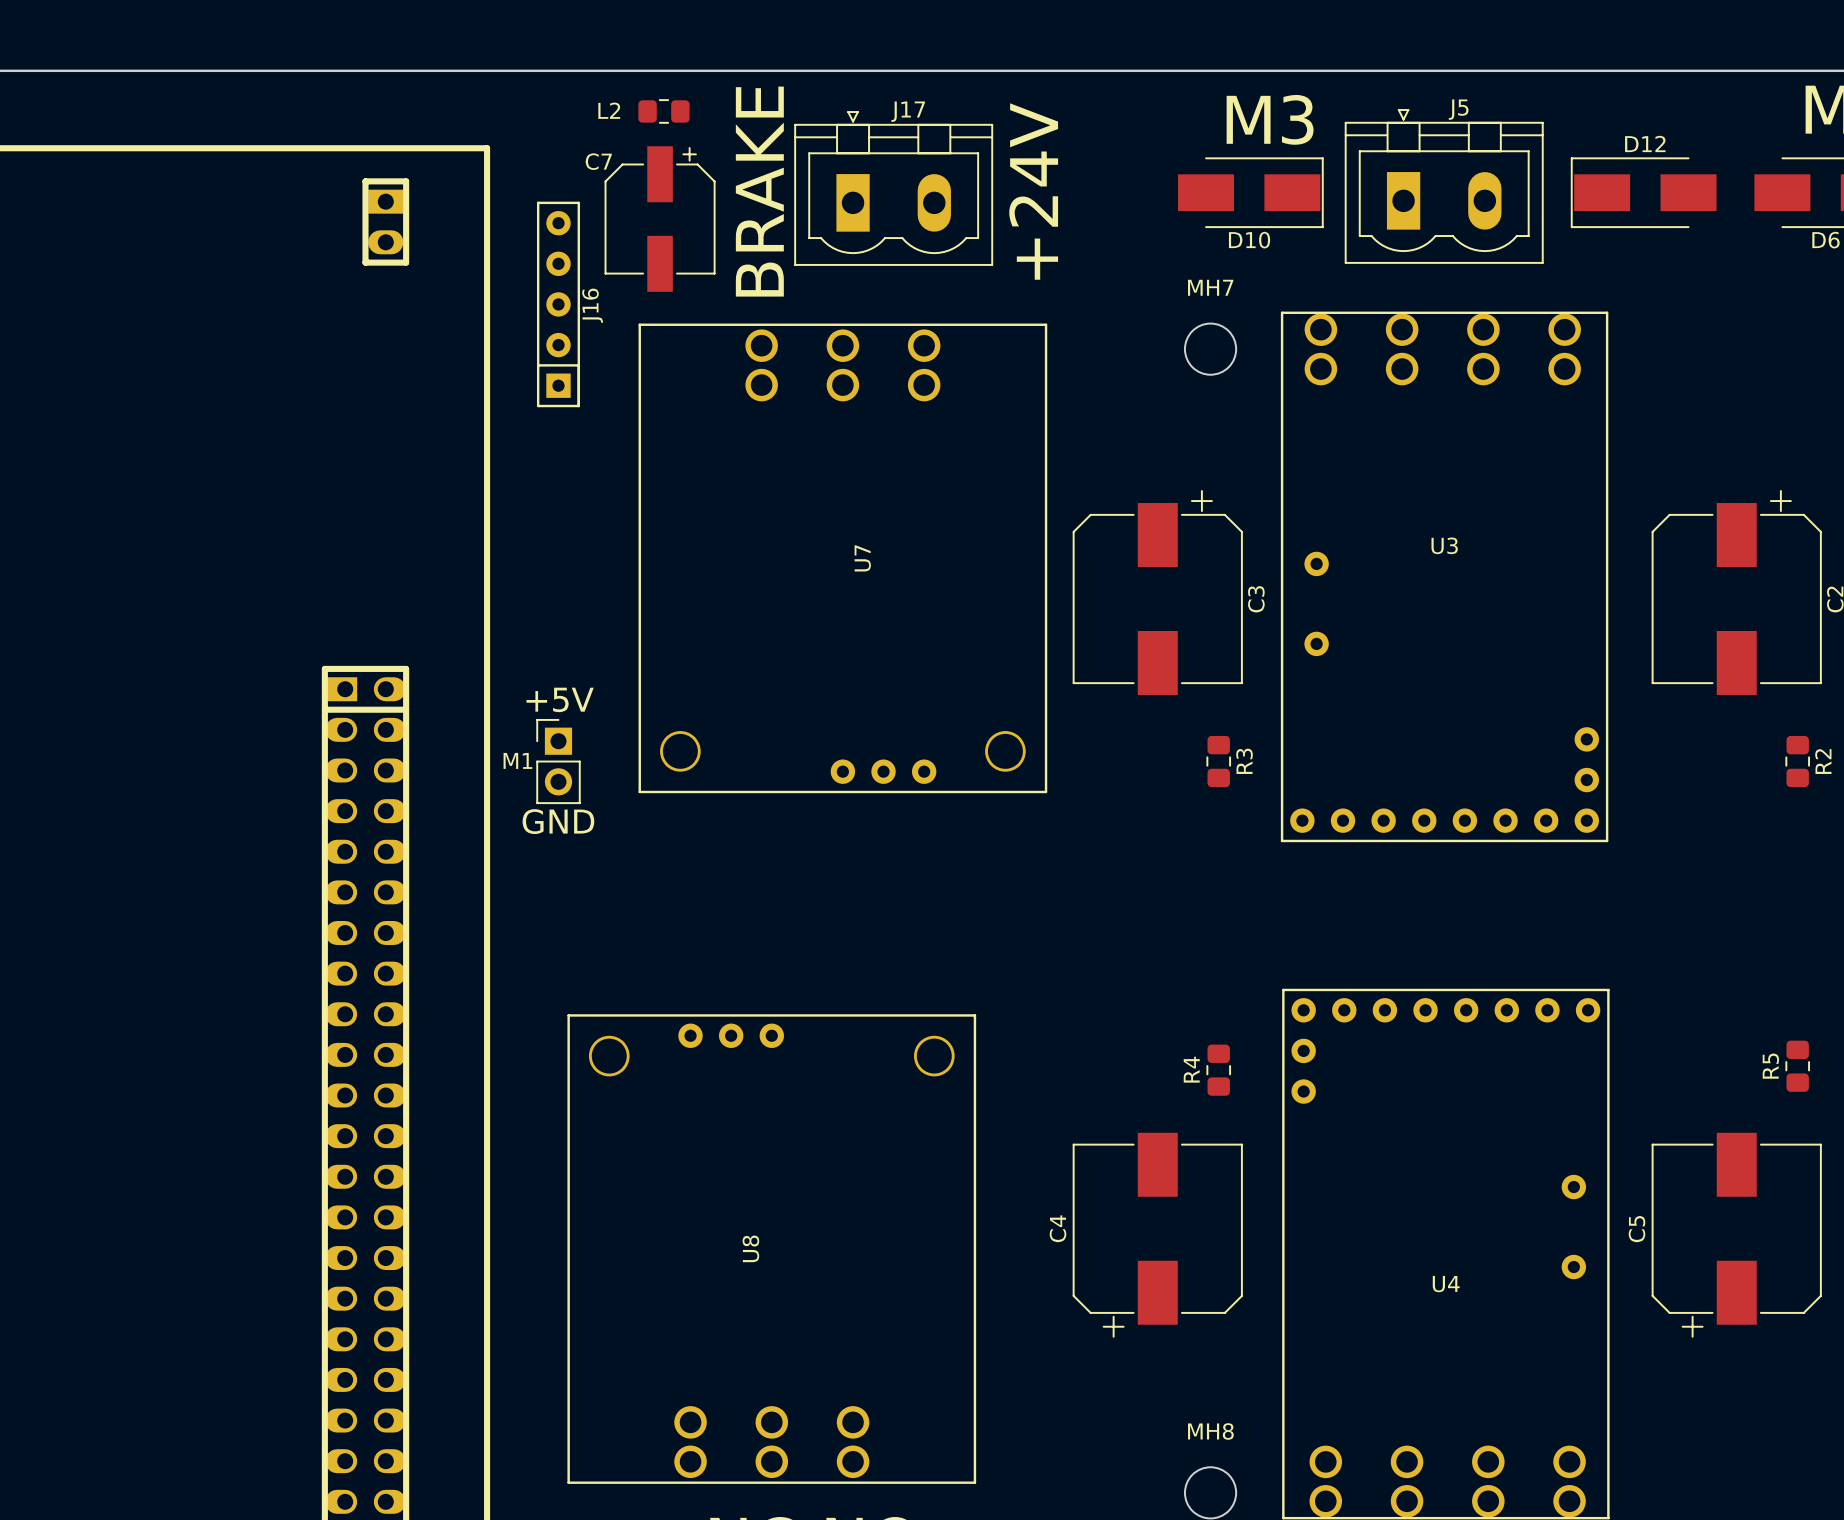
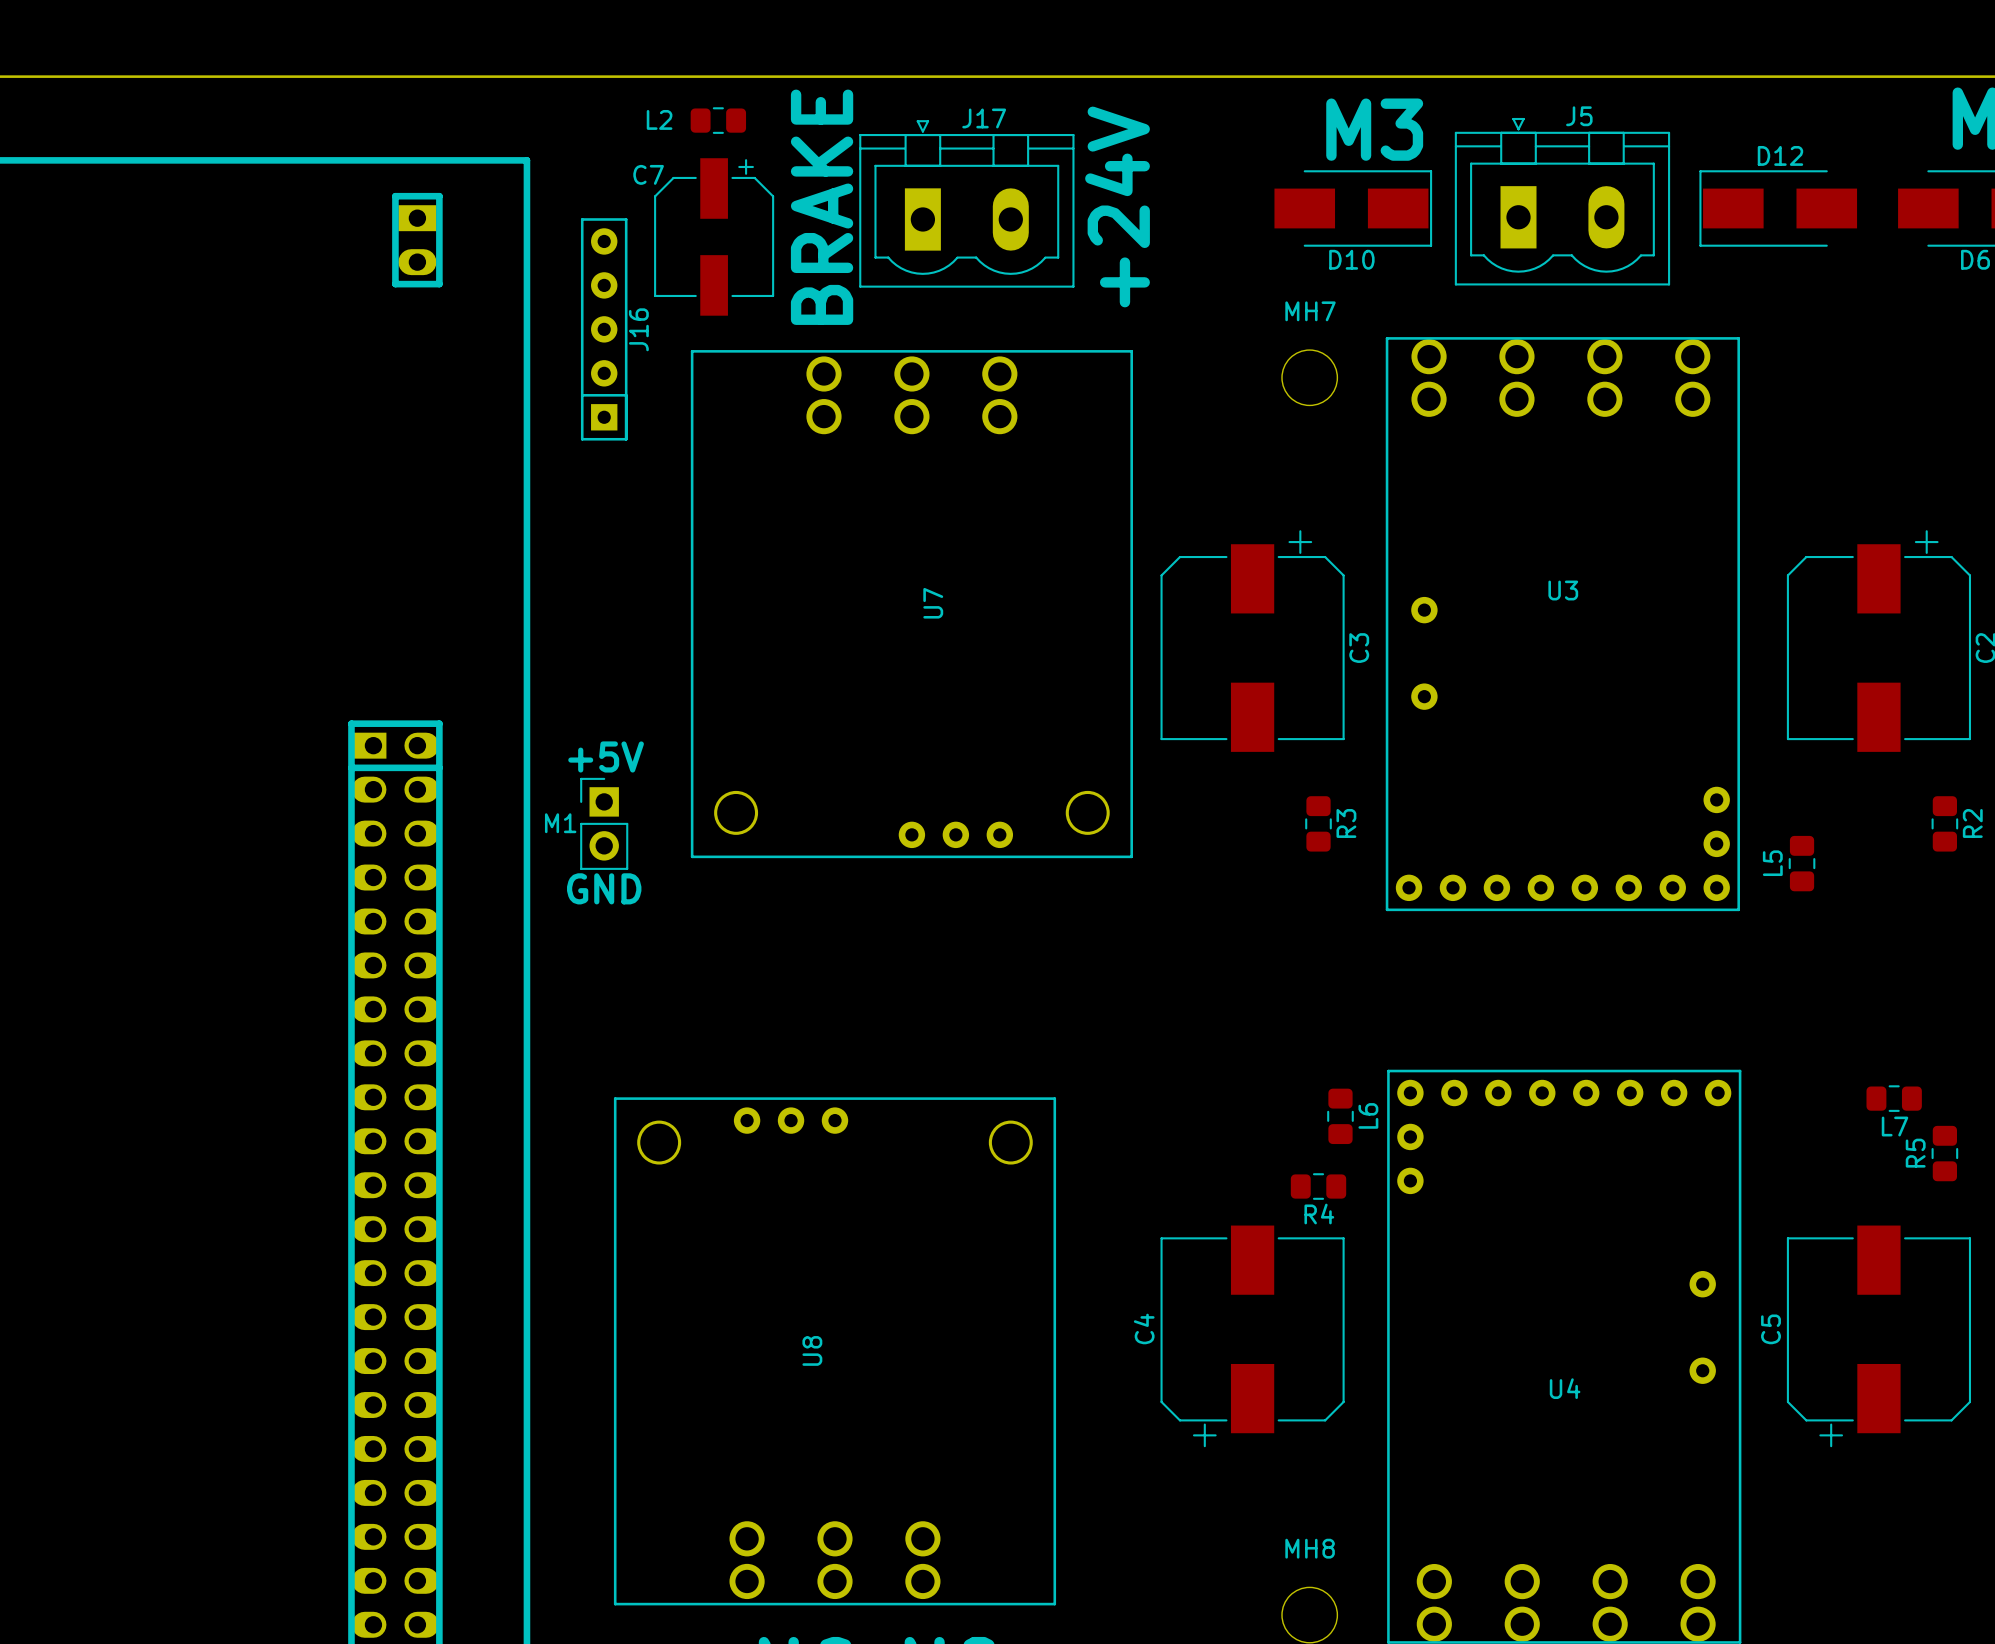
L5: none -> (1802, 863)
L7: none -> (1894, 1098)
L6: none -> (1340, 1116)
R4 name position: R4 (1191, 1069) -> R4 (1319, 1214)
R4 rotation: 0° (1218, 1070) -> 90° clockwise (1318, 1186)

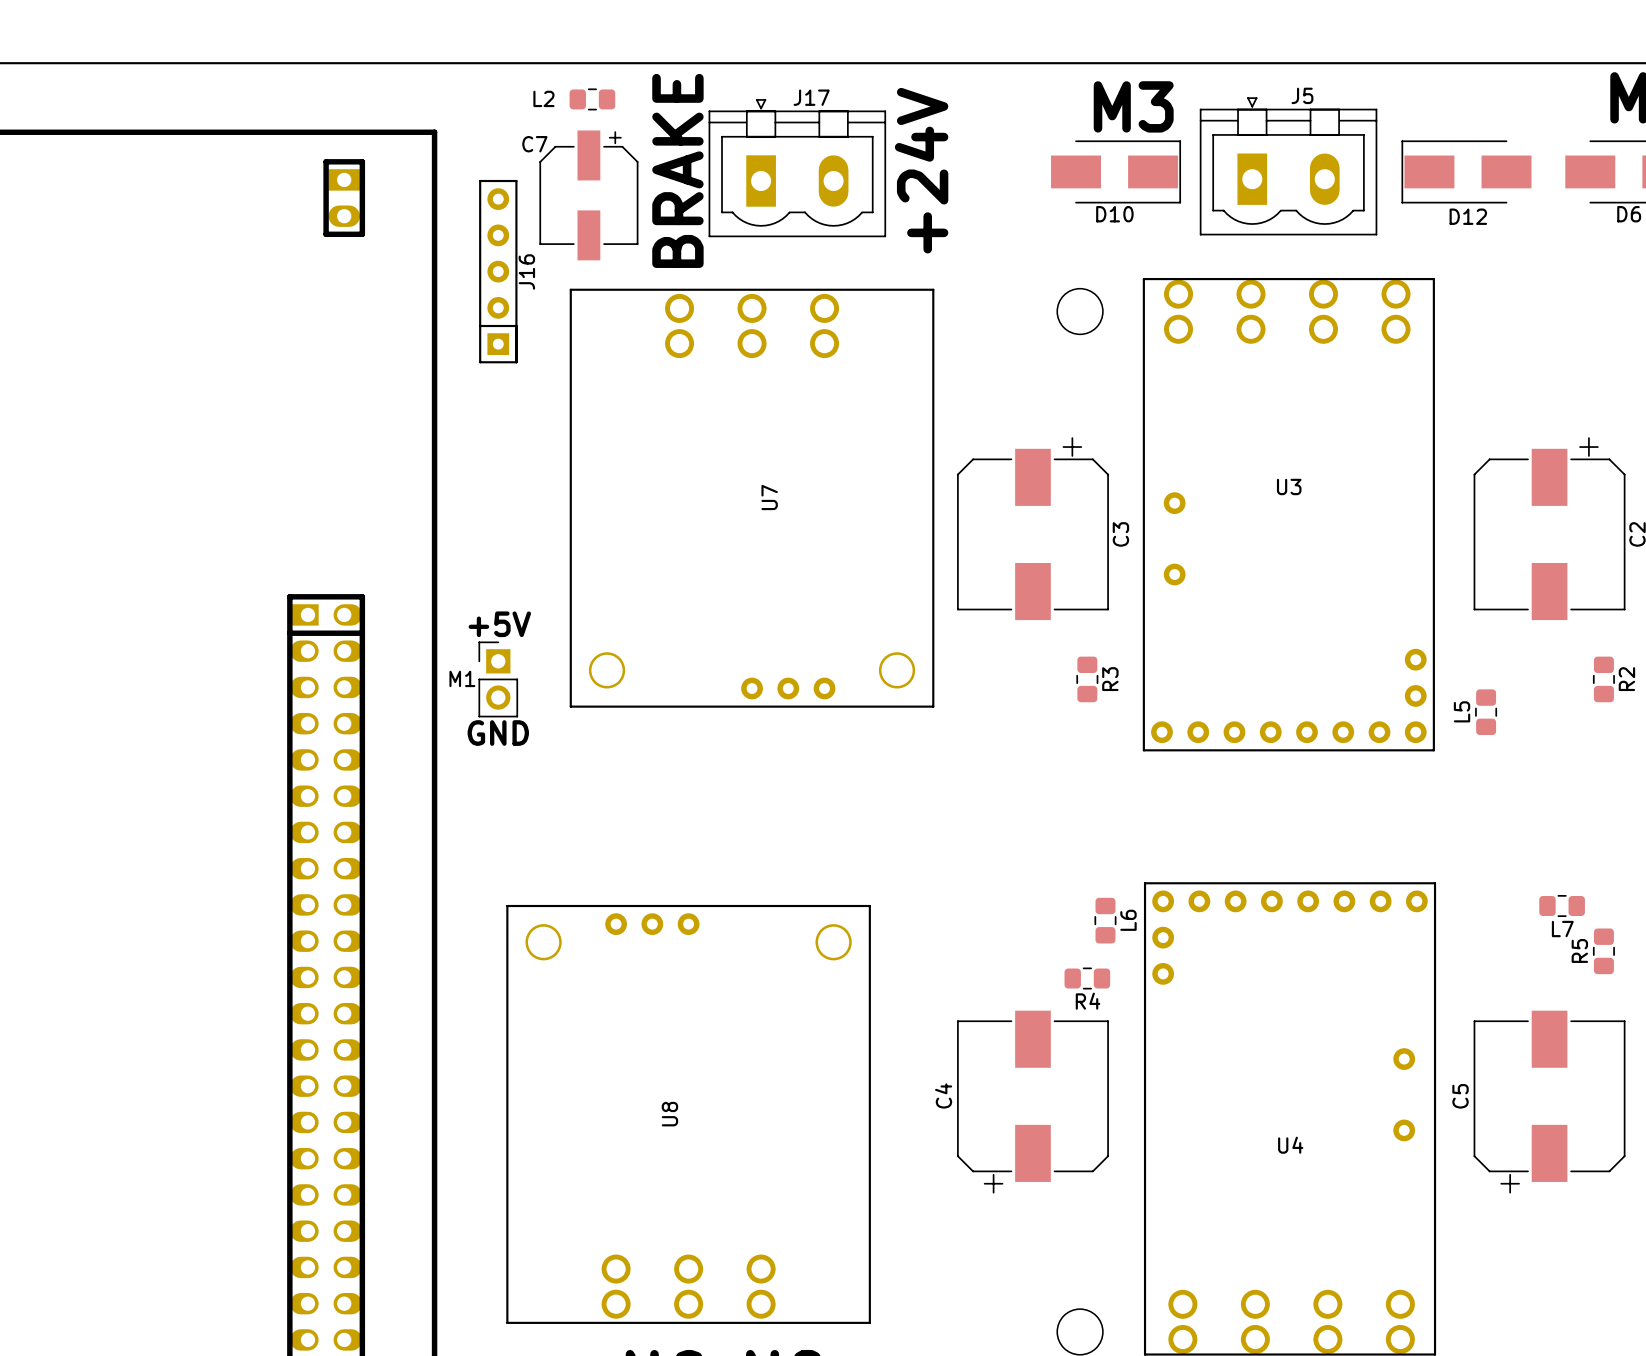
D12 name position: D12 (1780, 155) -> D12 (1468, 216)
MH7 name: MH7 (1310, 311) -> none
MH8 name: MH8 (1310, 1548) -> none

